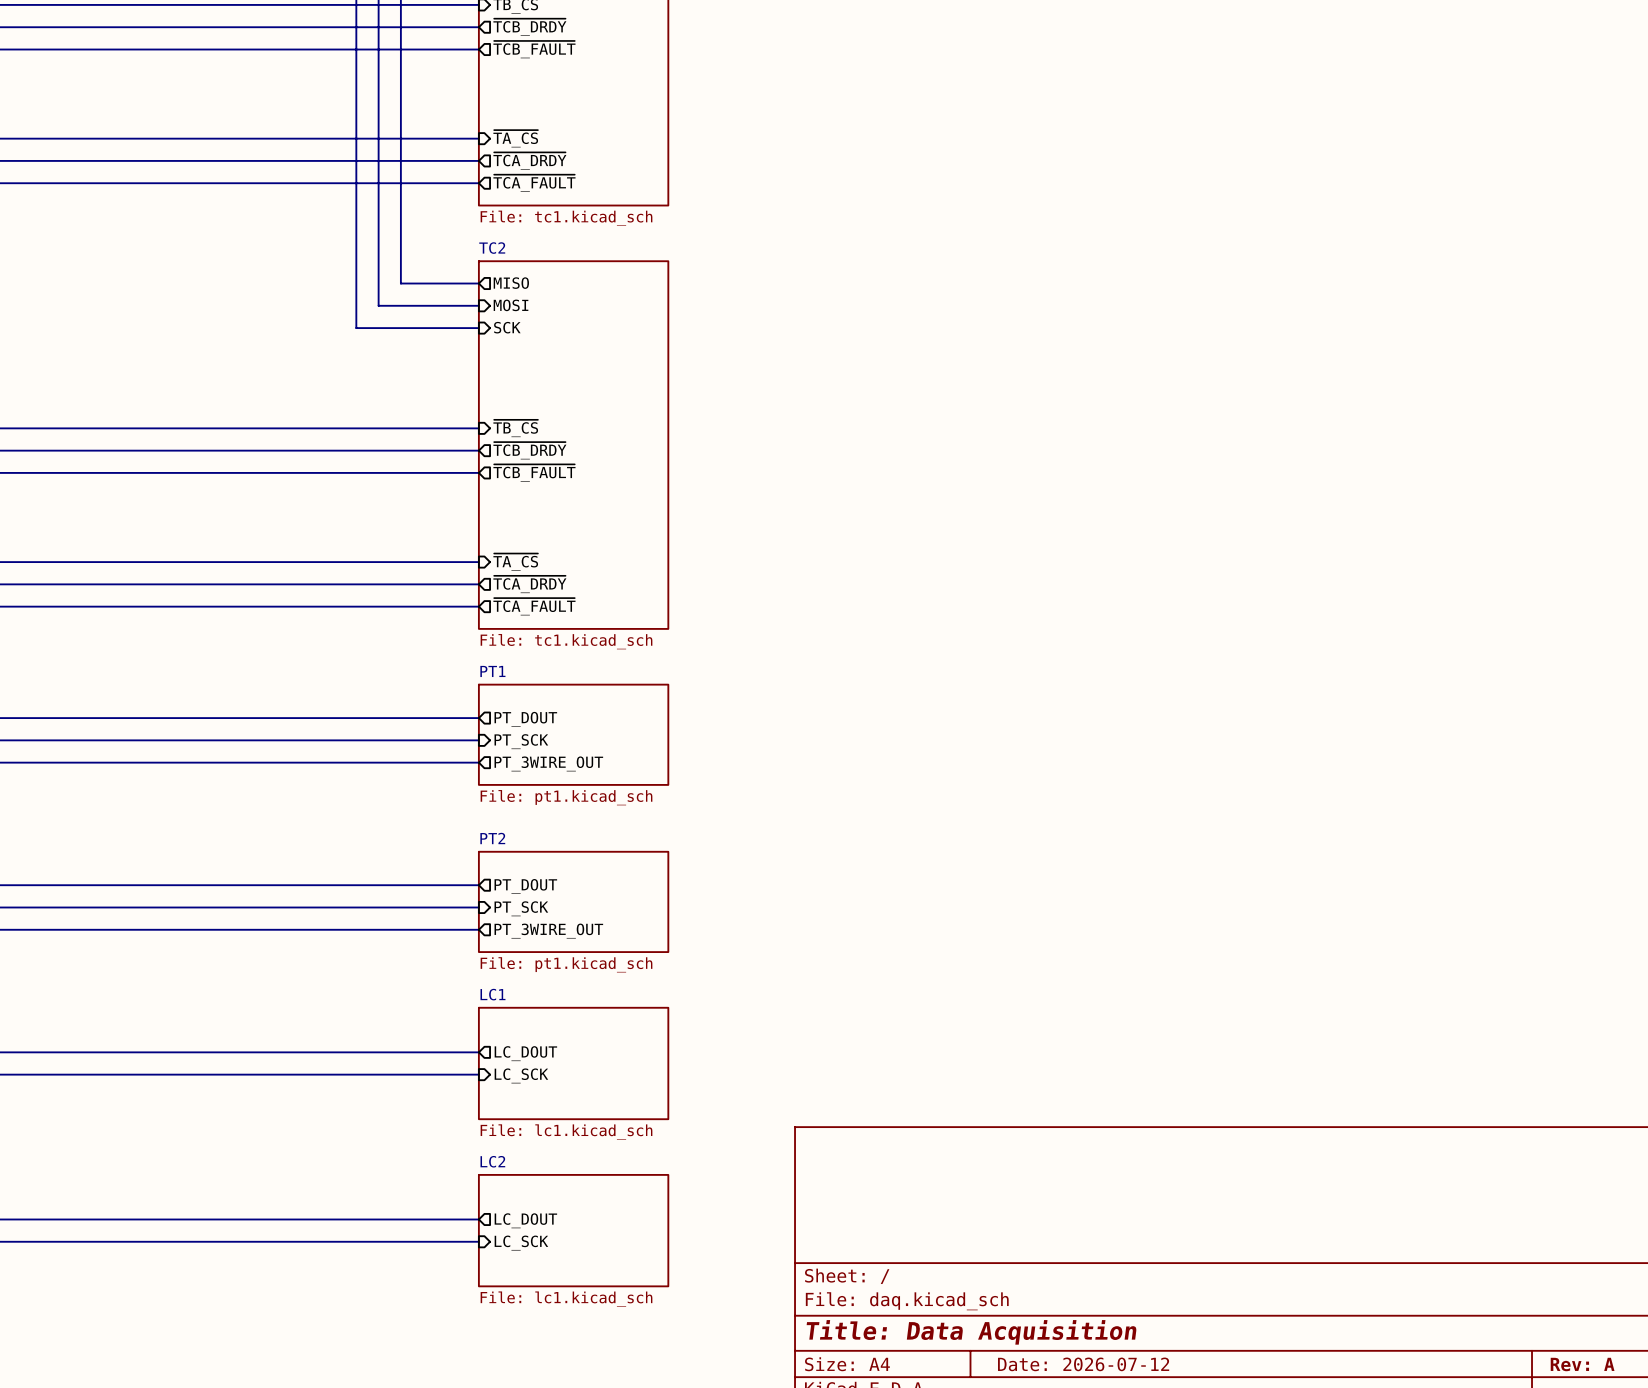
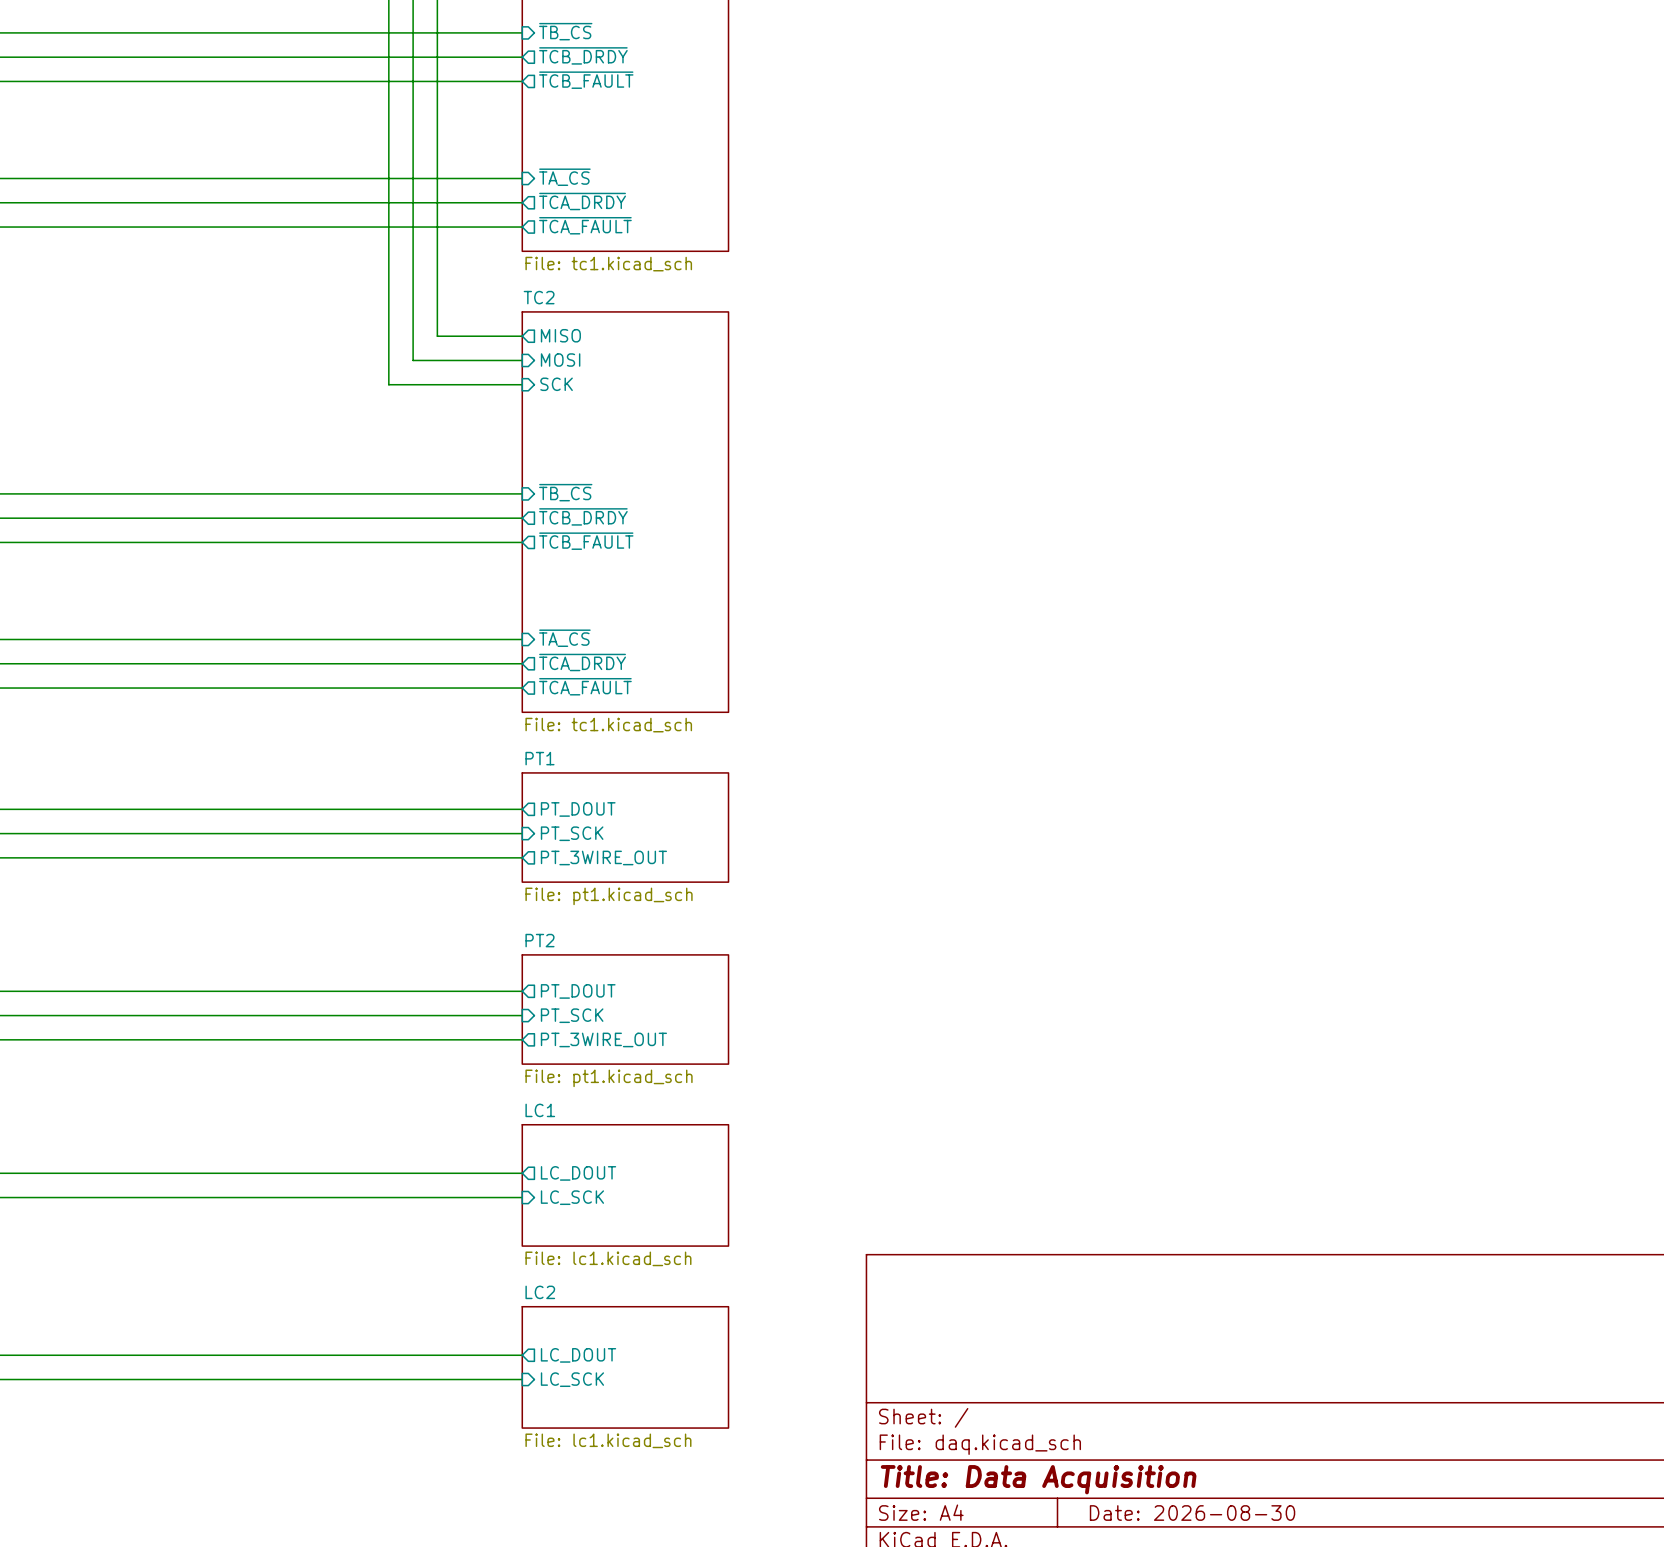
title block: Date: 2026-07-12 (1083, 1364) -> Date: 2026-08-30 (1192, 1513)

